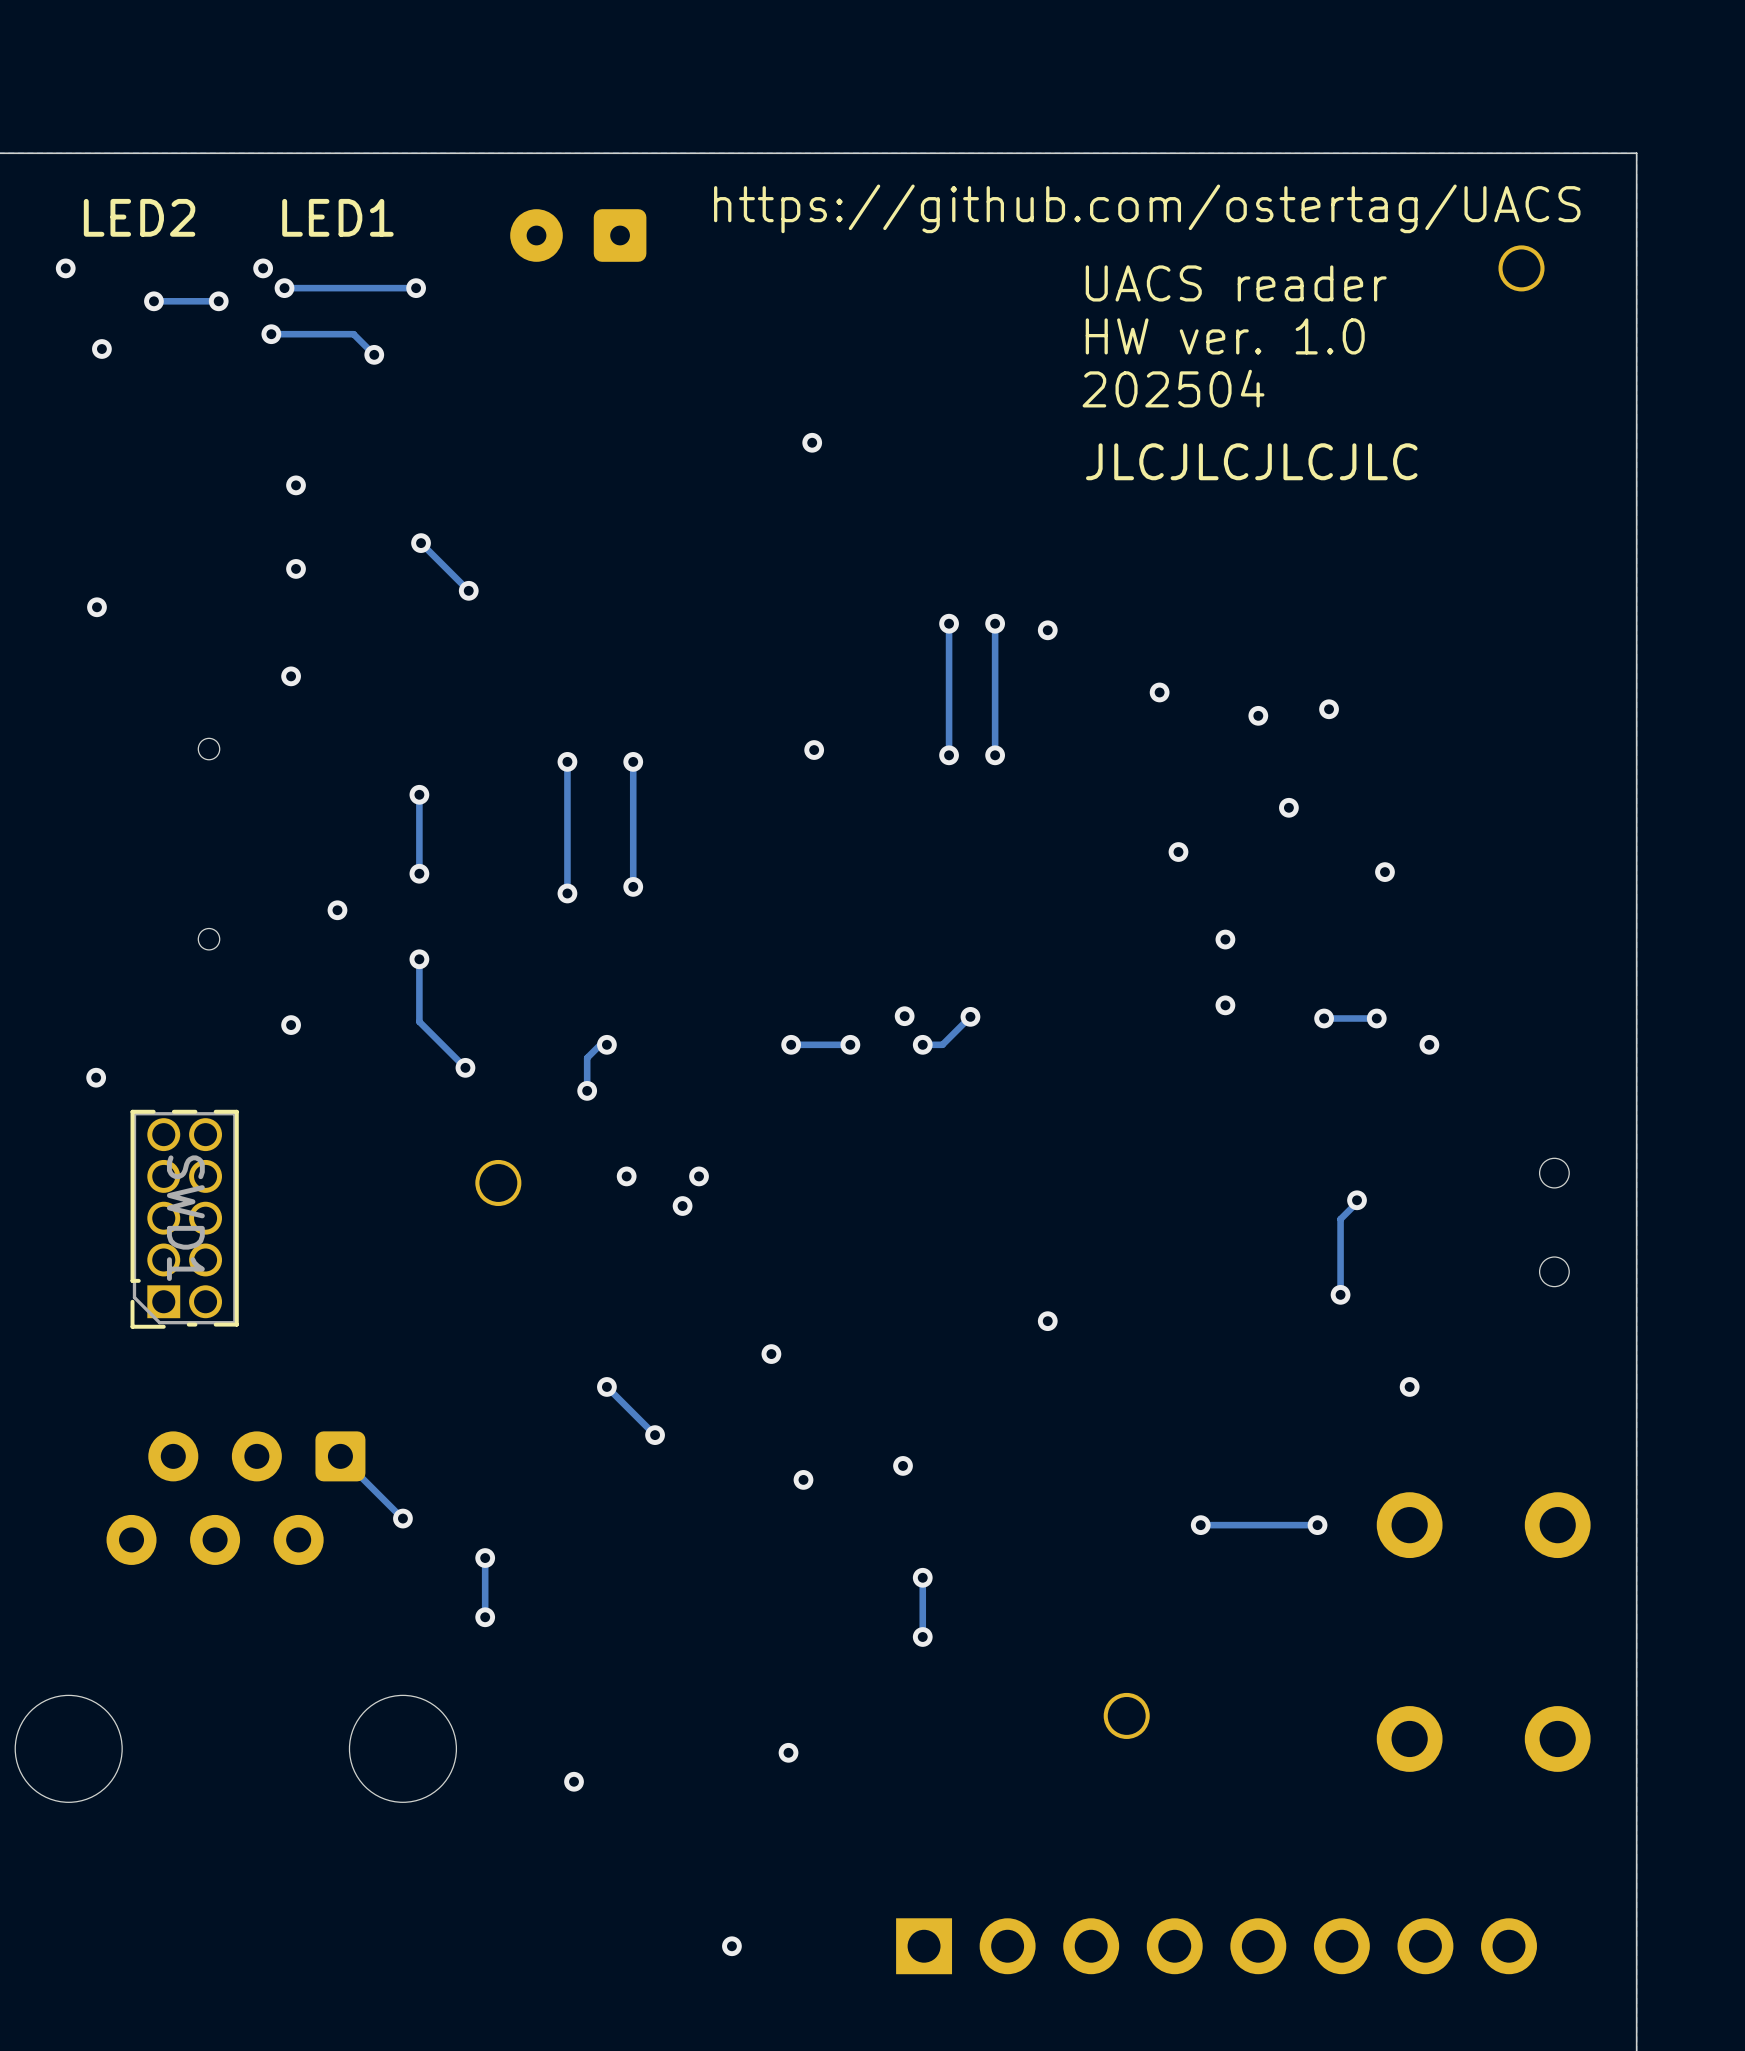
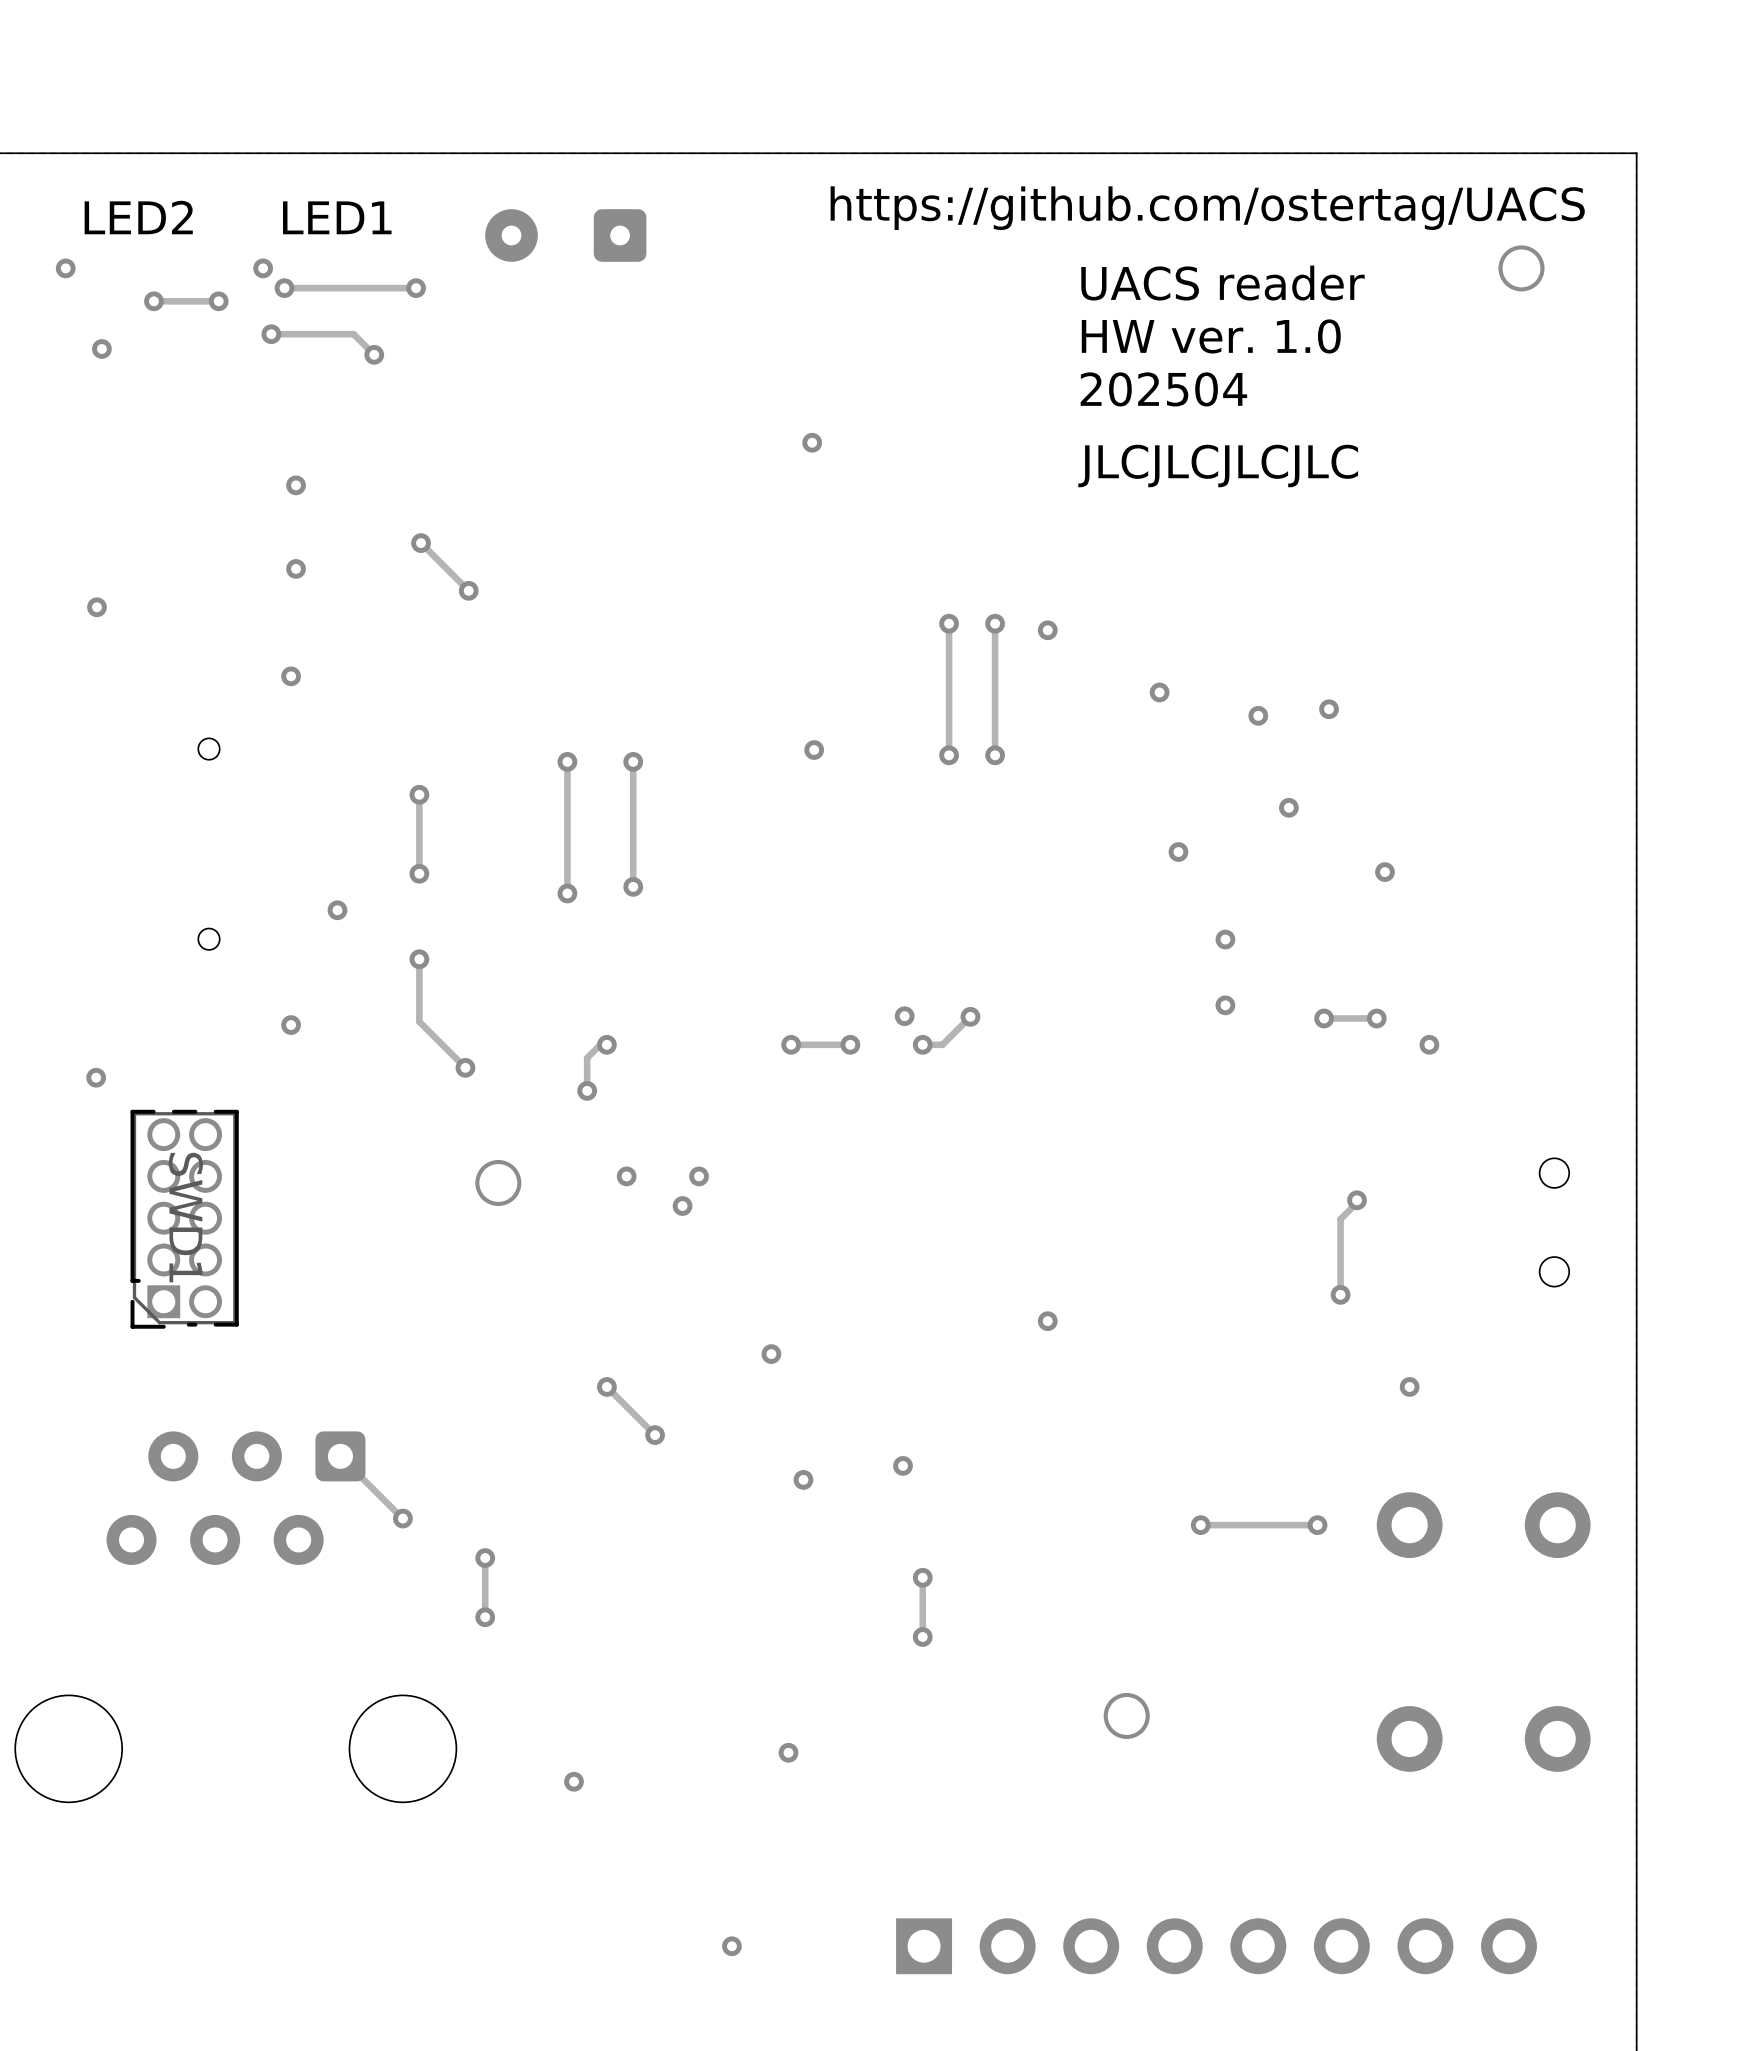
part footprint: [510, 209, 647, 262] -> [485, 209, 647, 262]

